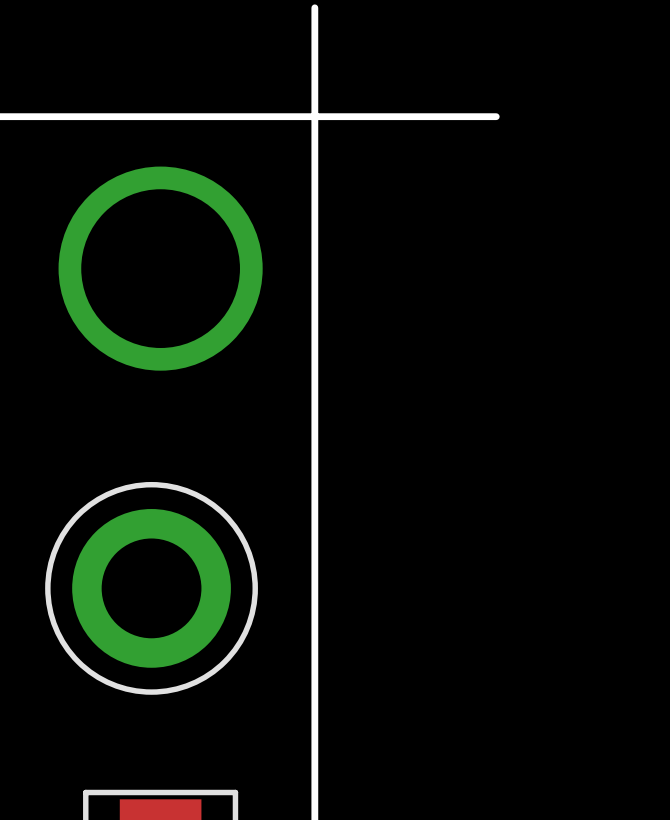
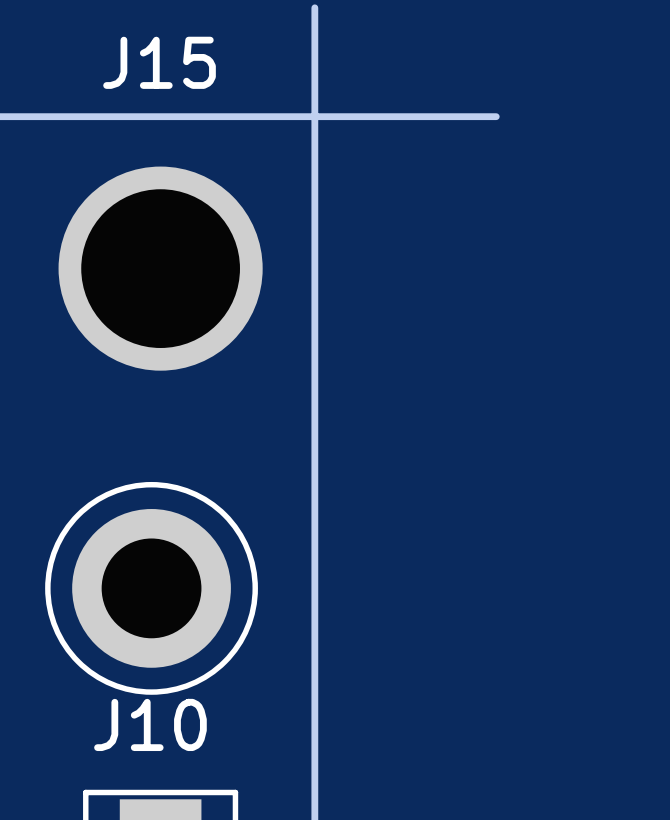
J15 name: none -> J15 (159, 62)
J10 name: none -> J10 (150, 724)

